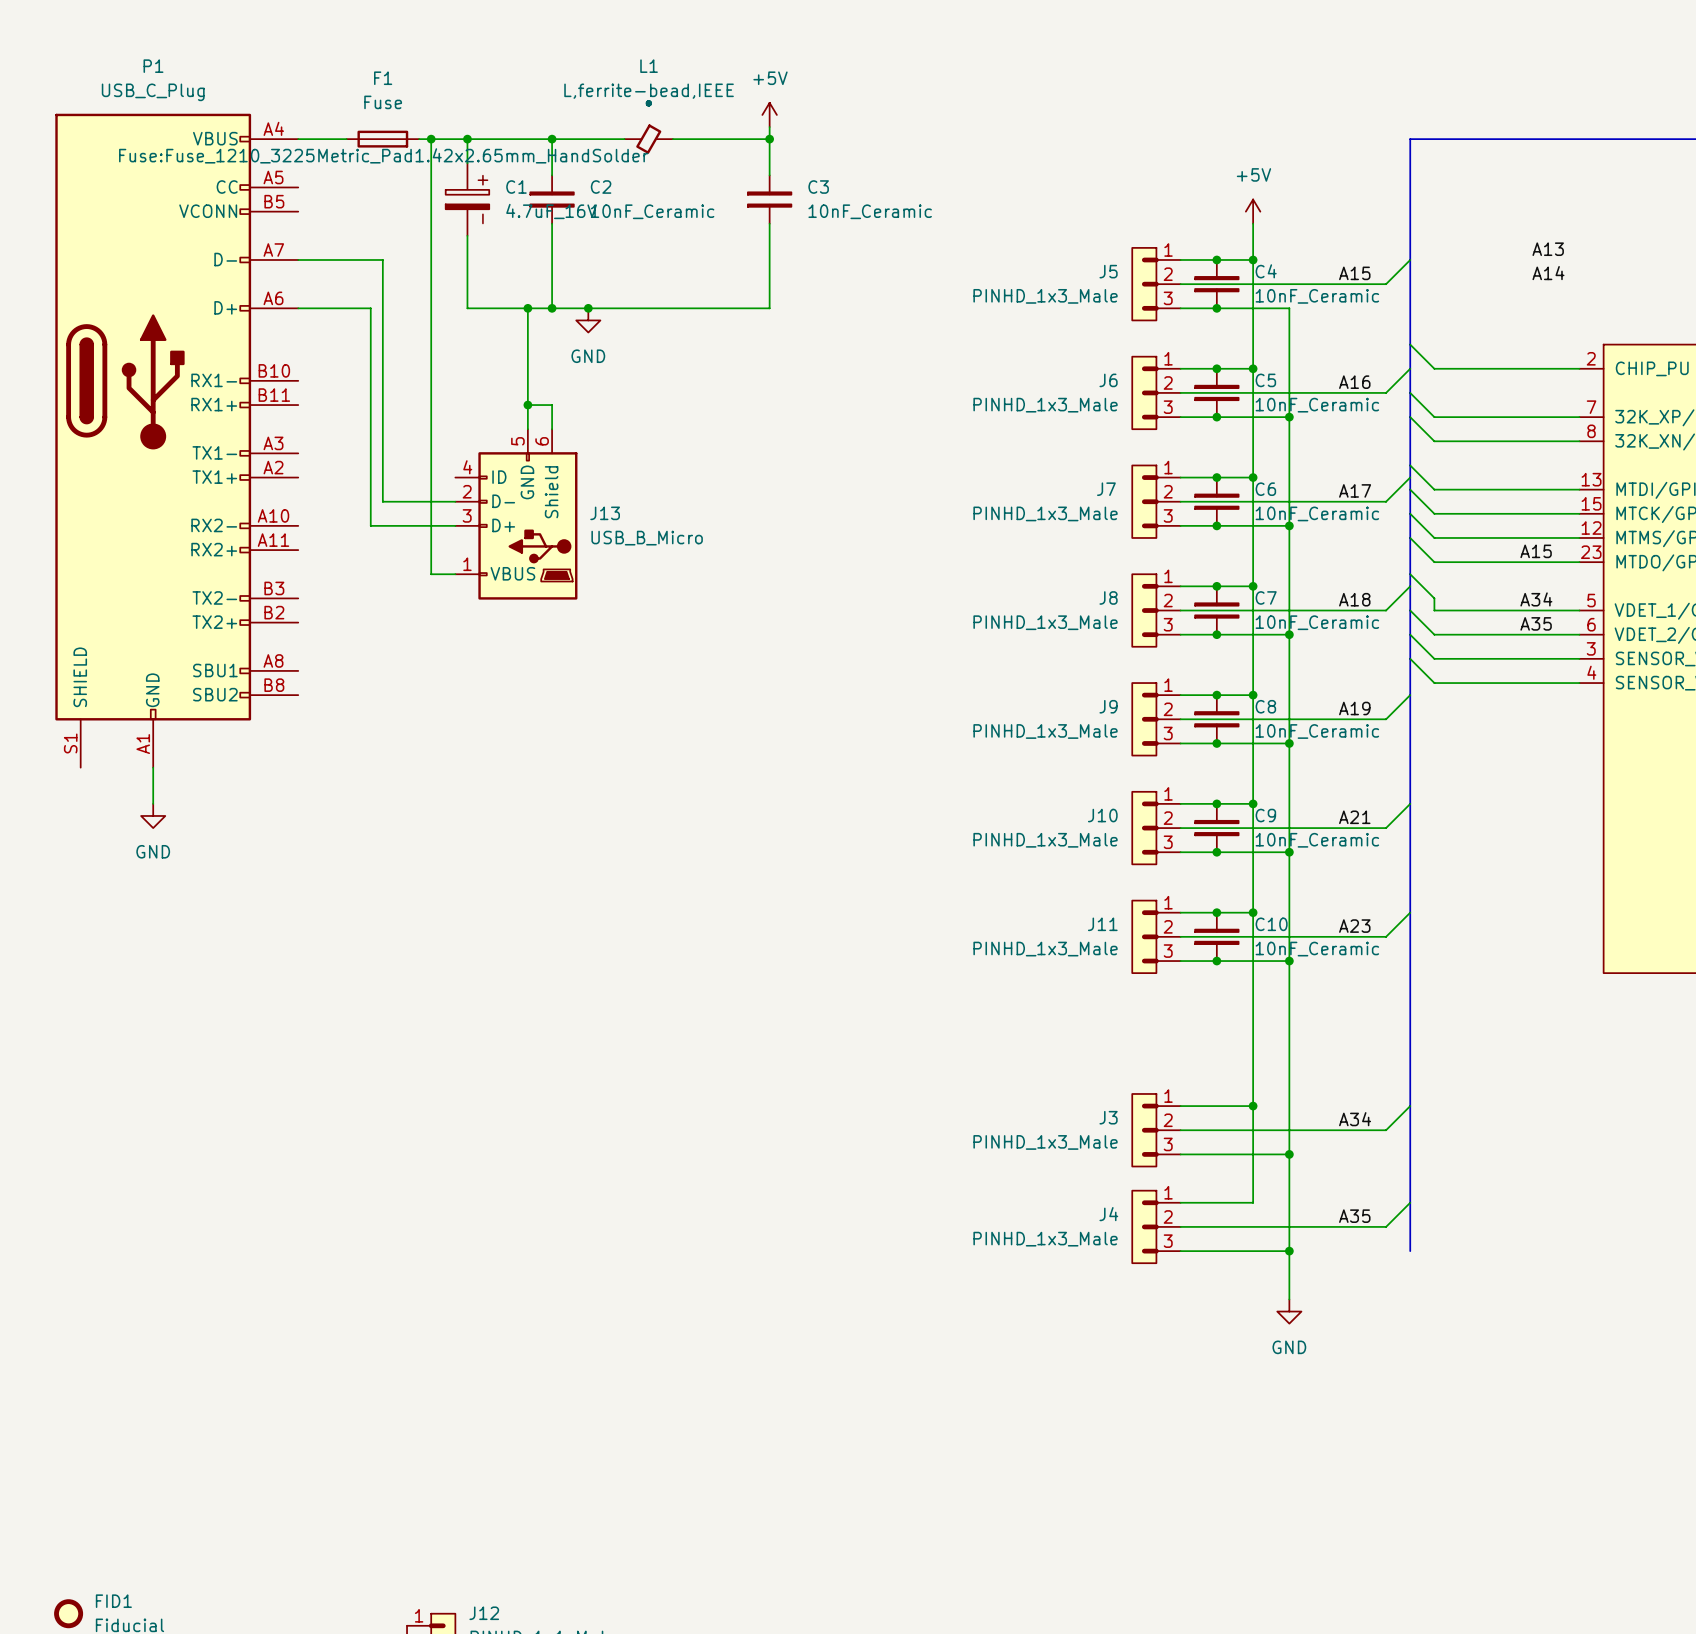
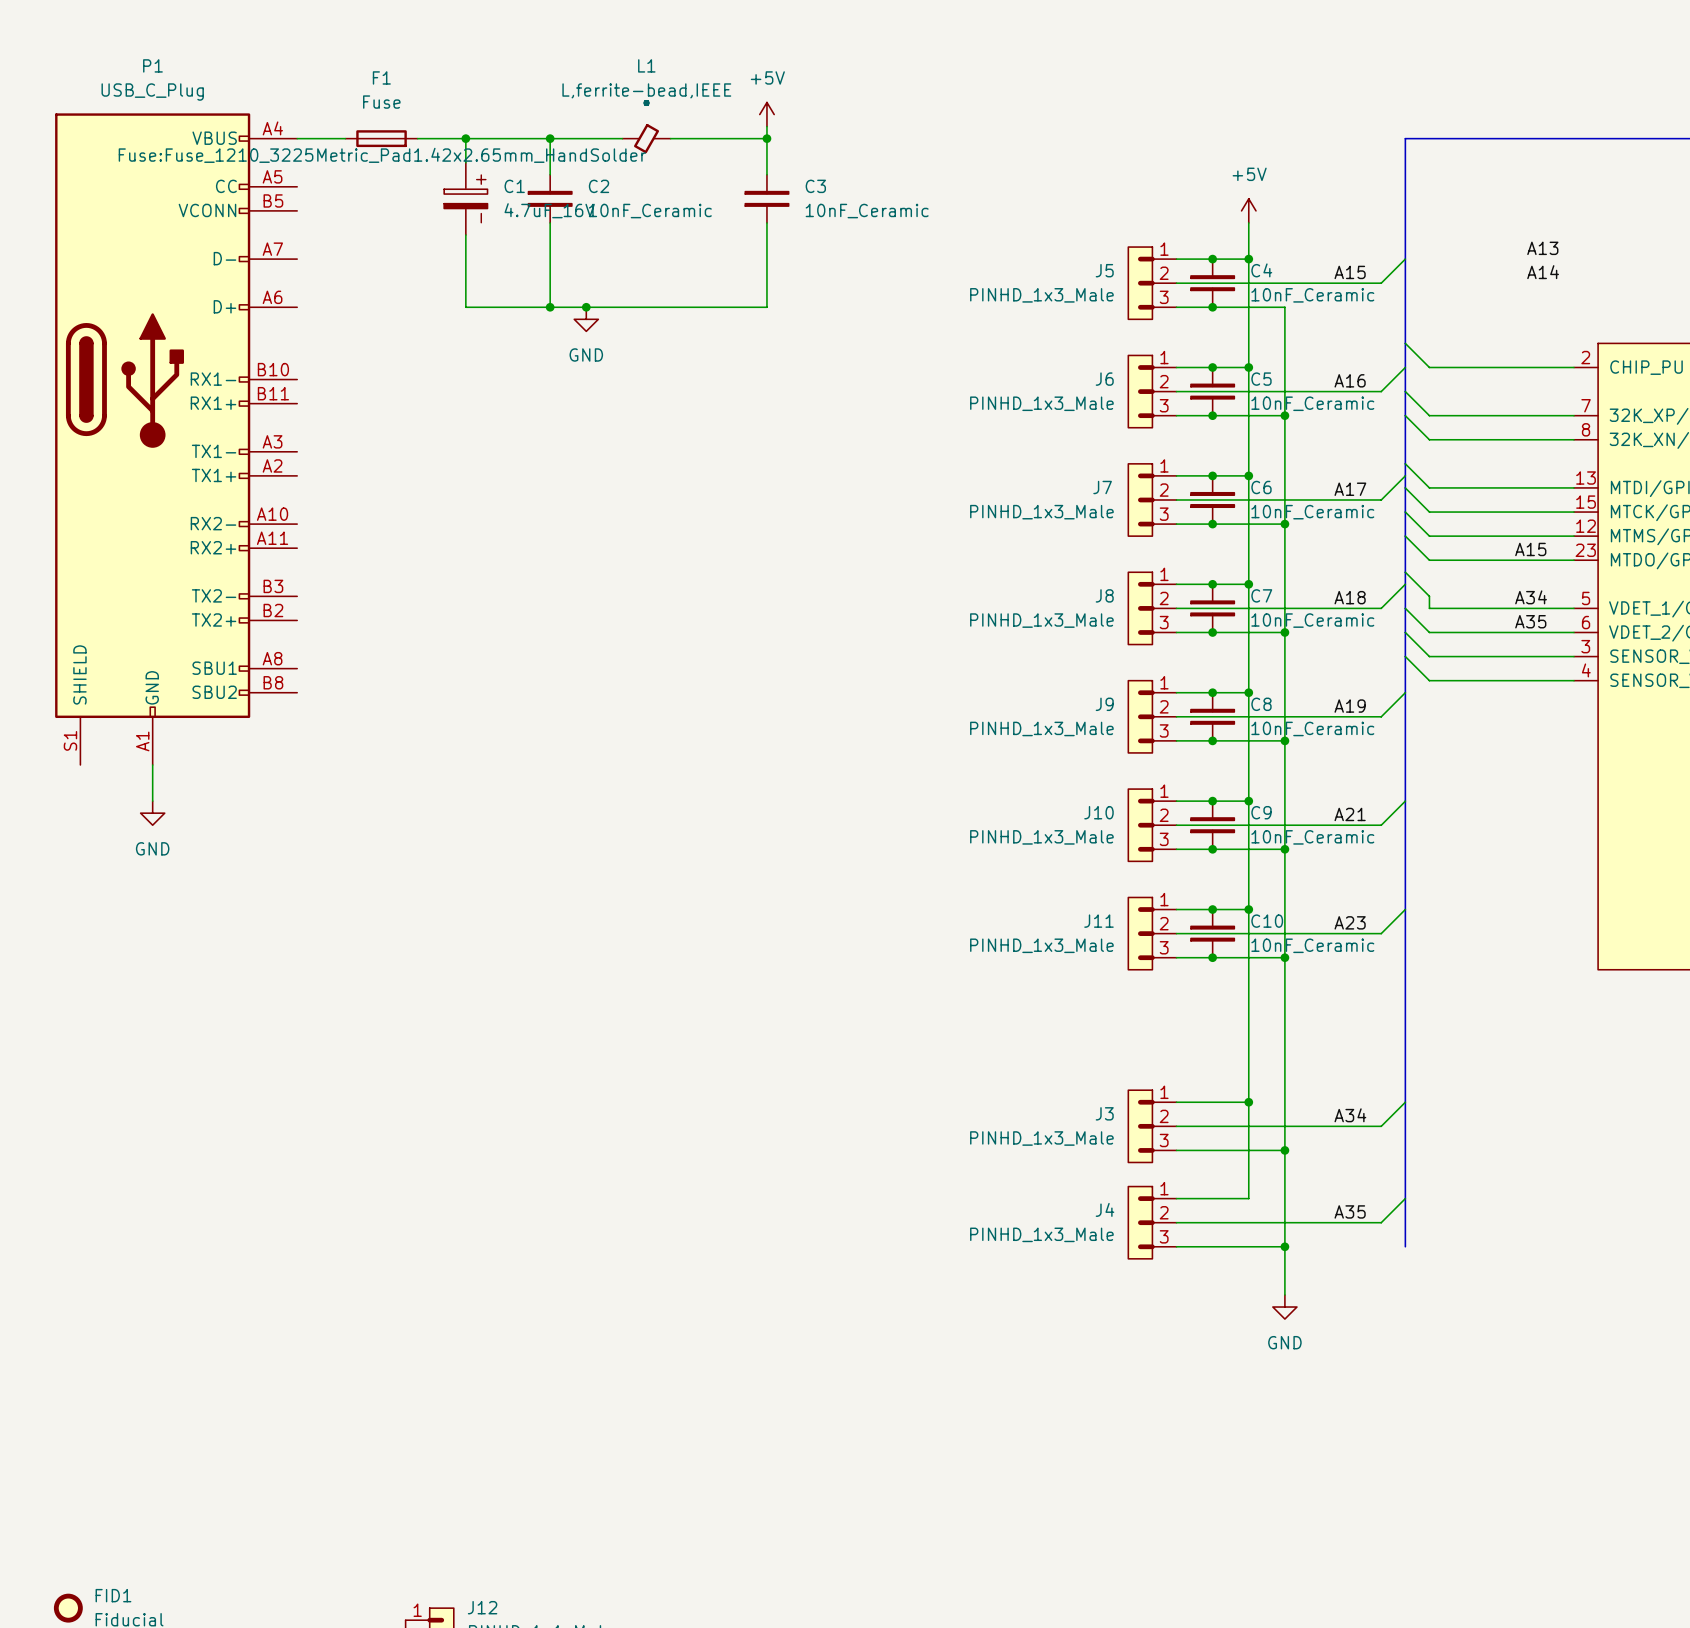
wire: (431, 139) (431, 574) (455, 574) -> none
junction: (431, 139) -> none
wire: (298, 259) (382, 259) (382, 501) (455, 501) -> none
wire: (298, 308) (370, 308) (370, 525) (455, 525) -> none
wire: (527, 308) (527, 429) -> none
junction: (527, 308) -> none
wire: (527, 405) (552, 405) (552, 429) -> none
junction: (527, 405) -> none
J13: USB_B_Micro (516, 514) -> none

